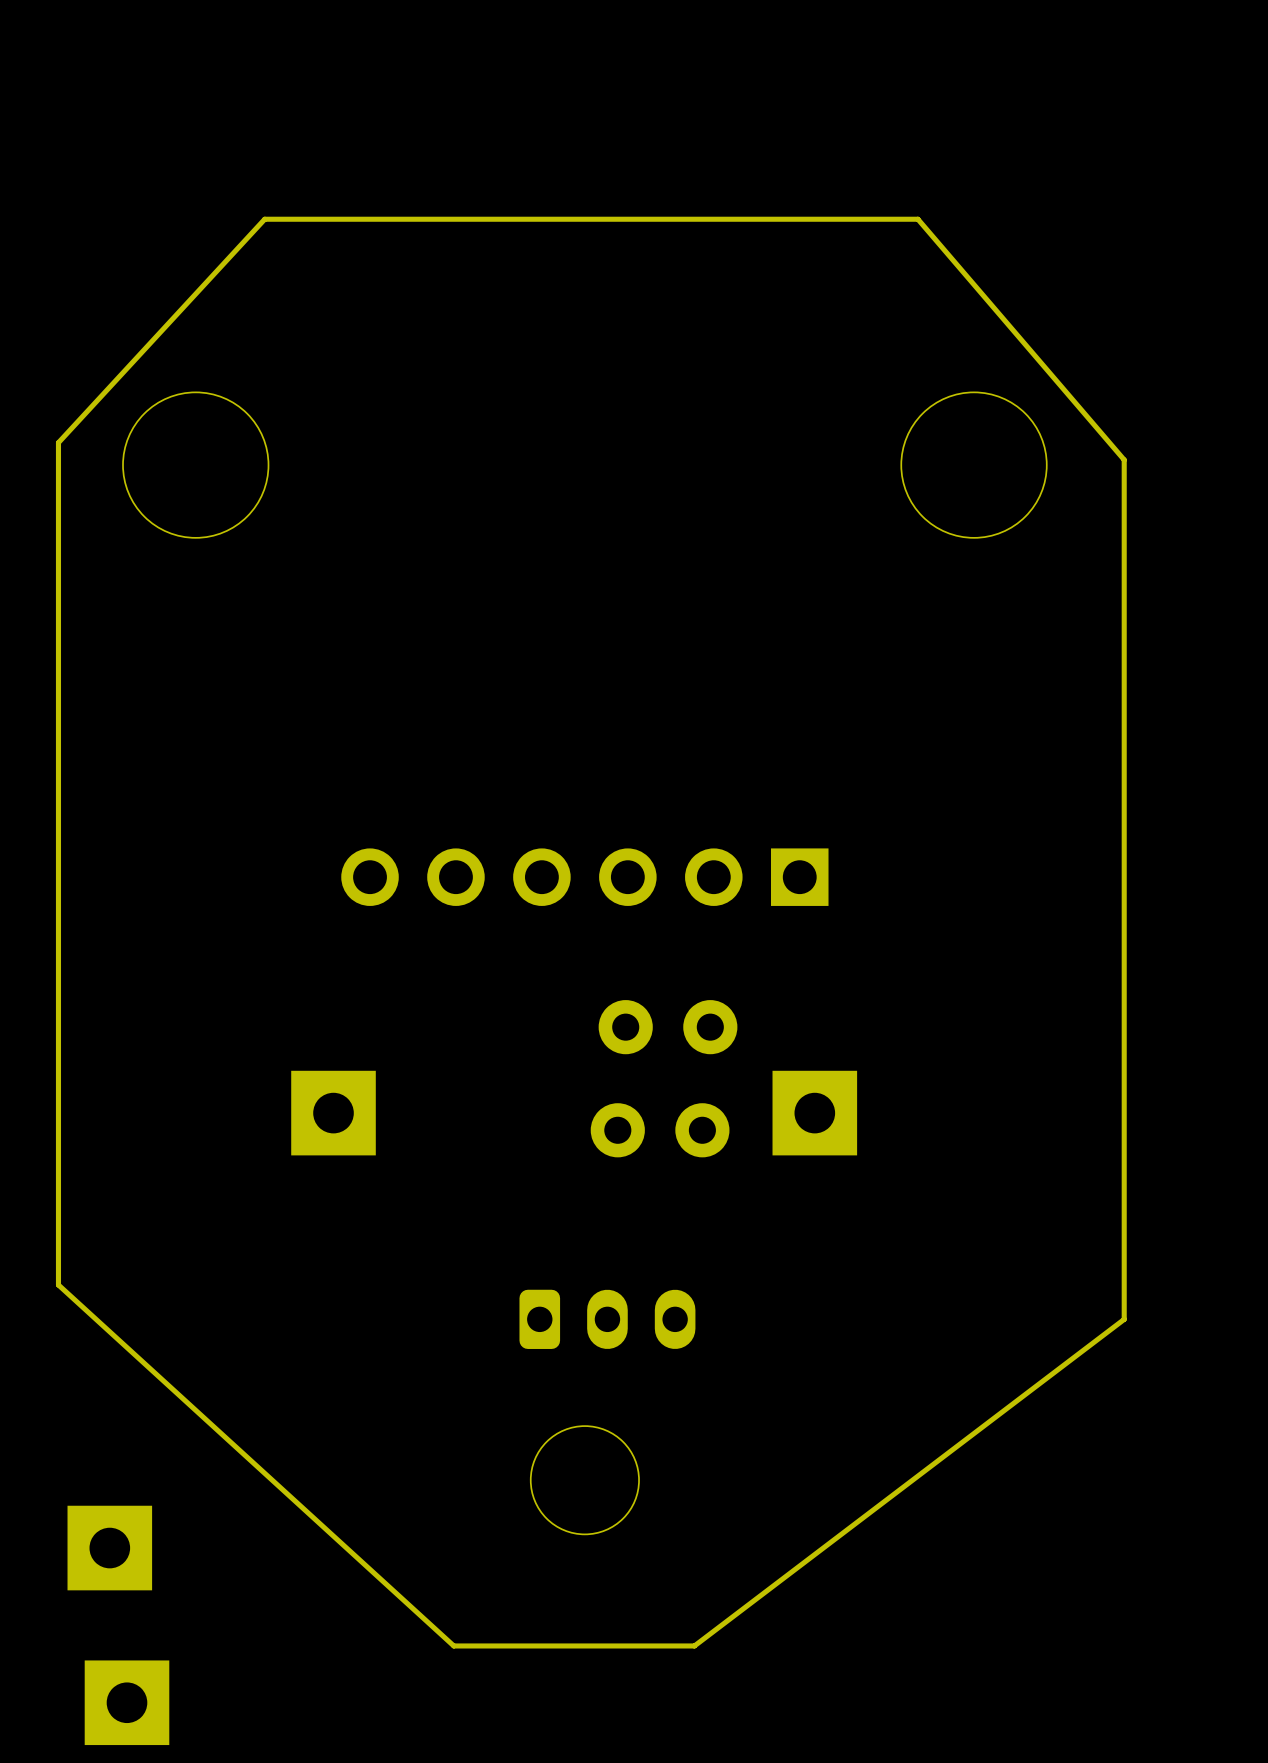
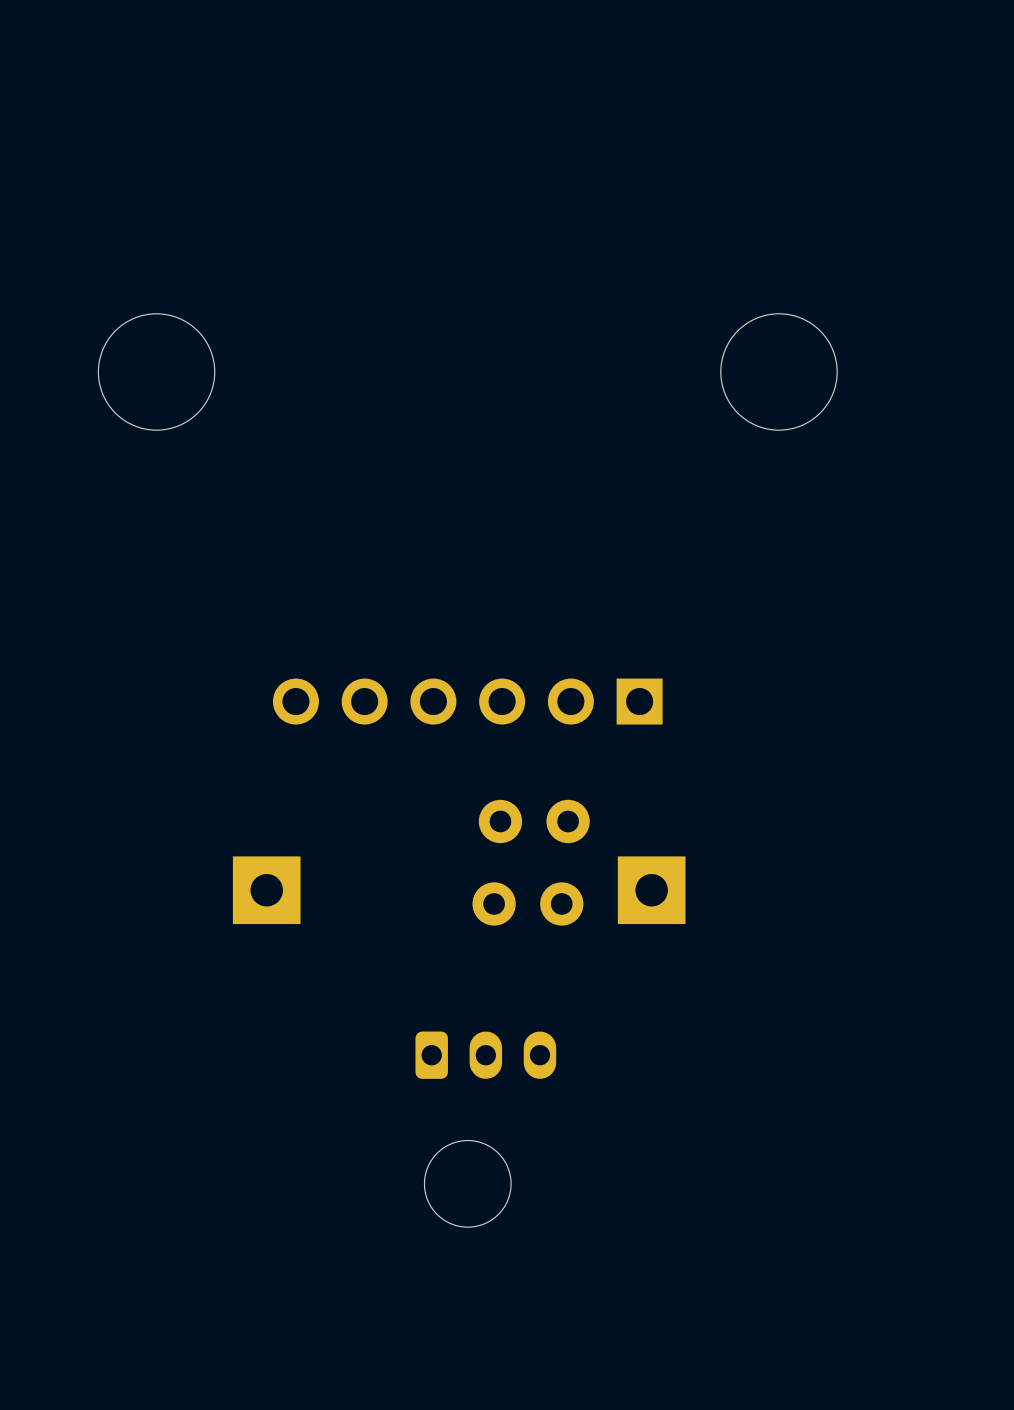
board edge: (917, 219) (264, 219) (58, 442) (58, 1284) (453, 1645) (694, 1645) (1124, 1319) (1124, 459) (917, 219) -> none
part: (109, 1548) -> none
part: (126, 1702) -> none

